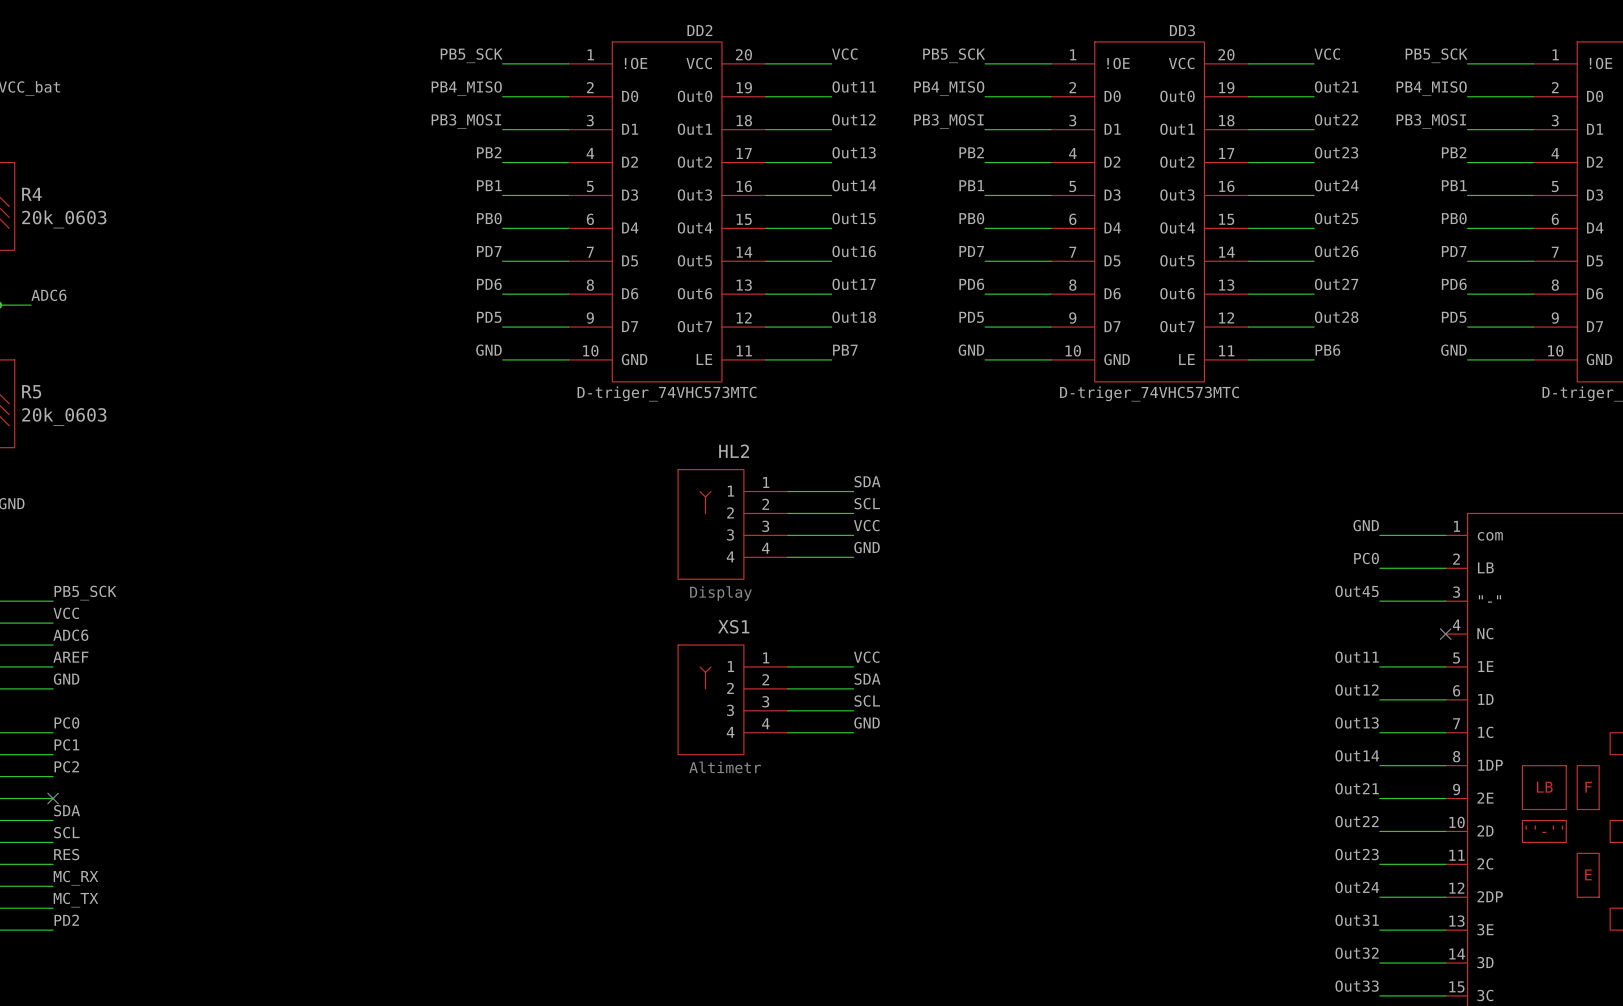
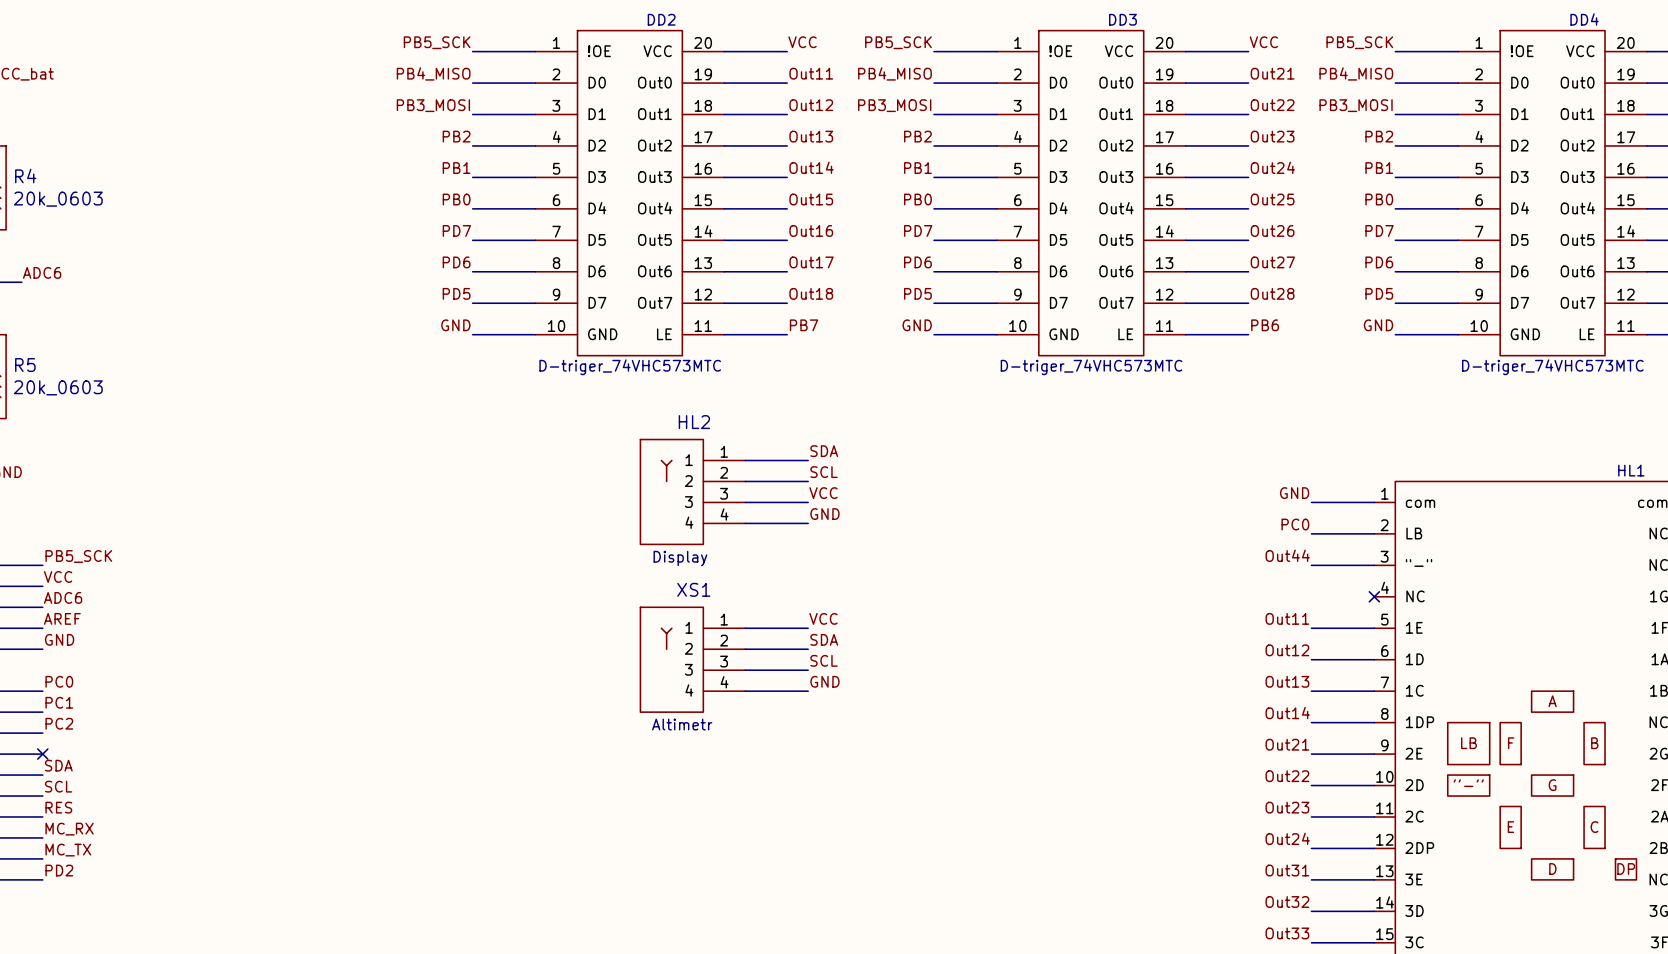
label: Out45 (1357, 591) -> Out44 (1287, 555)

